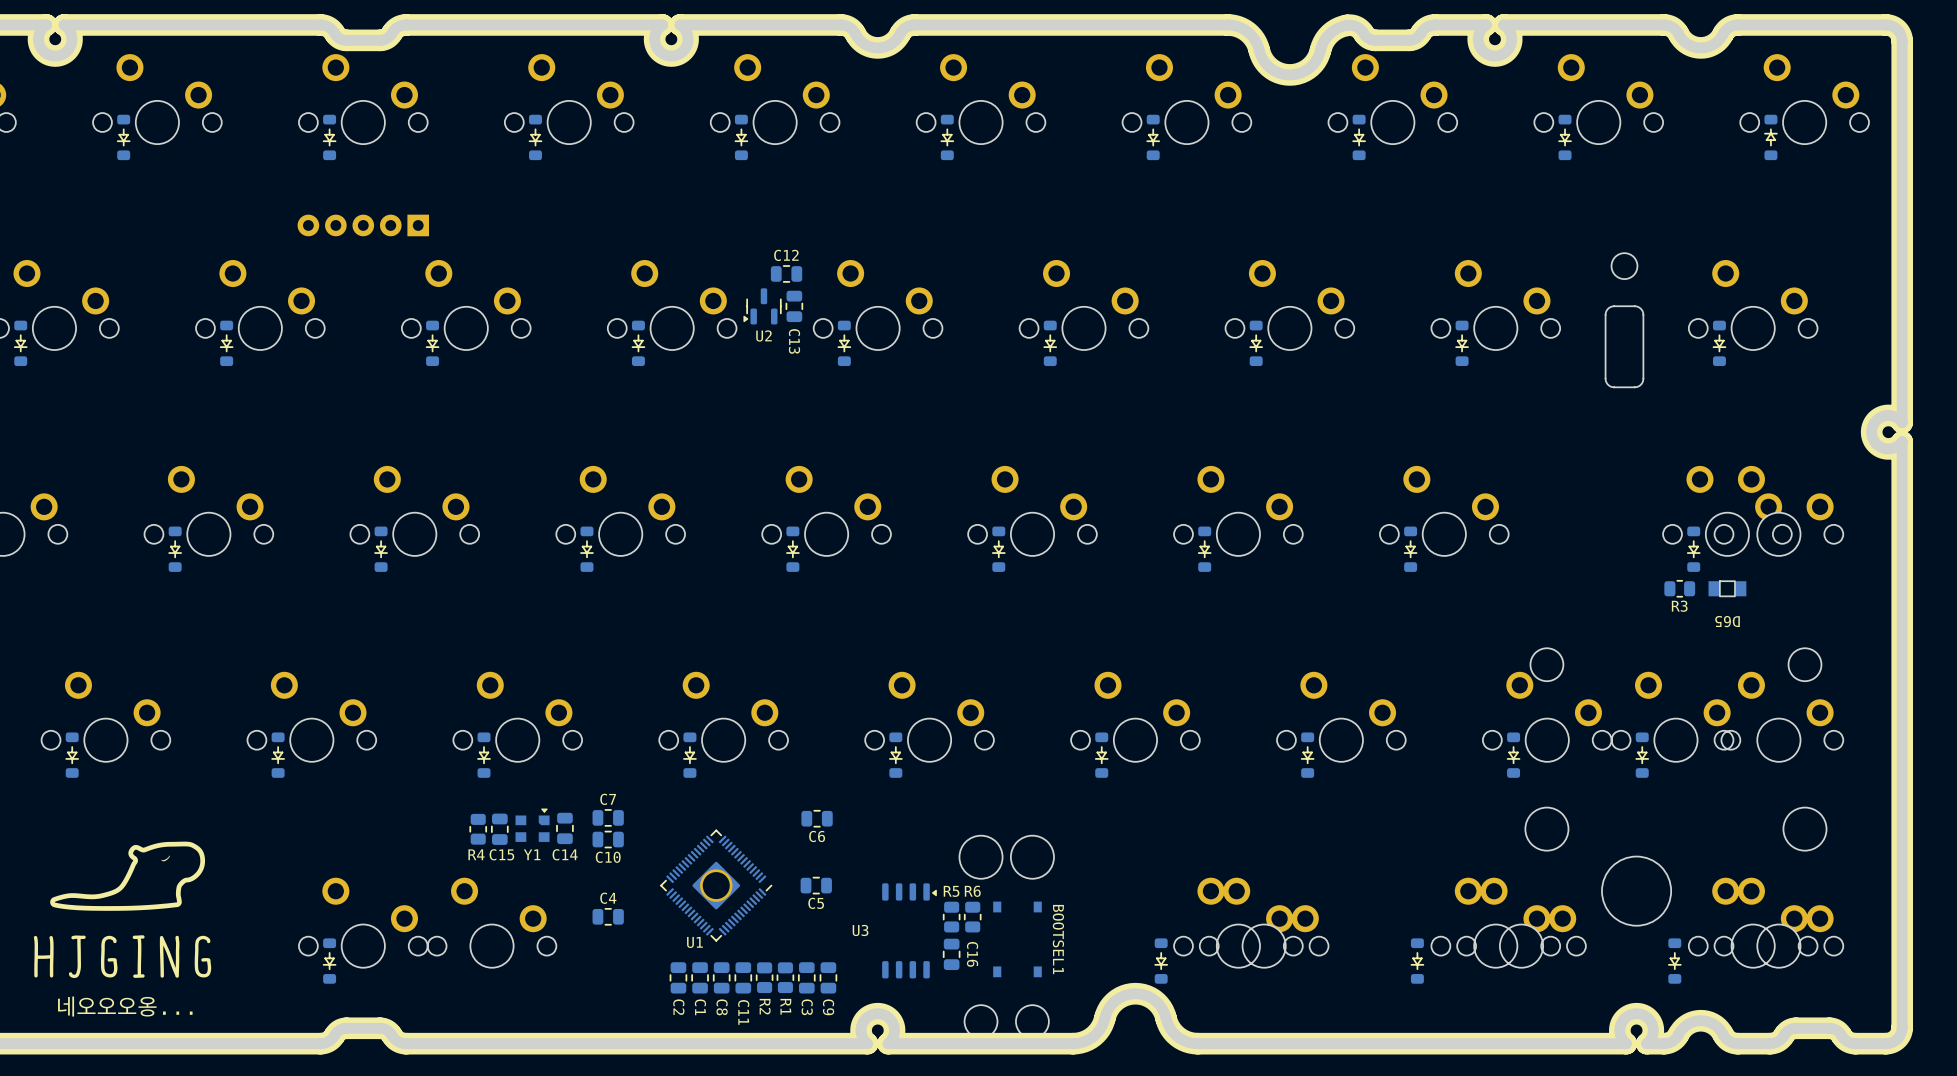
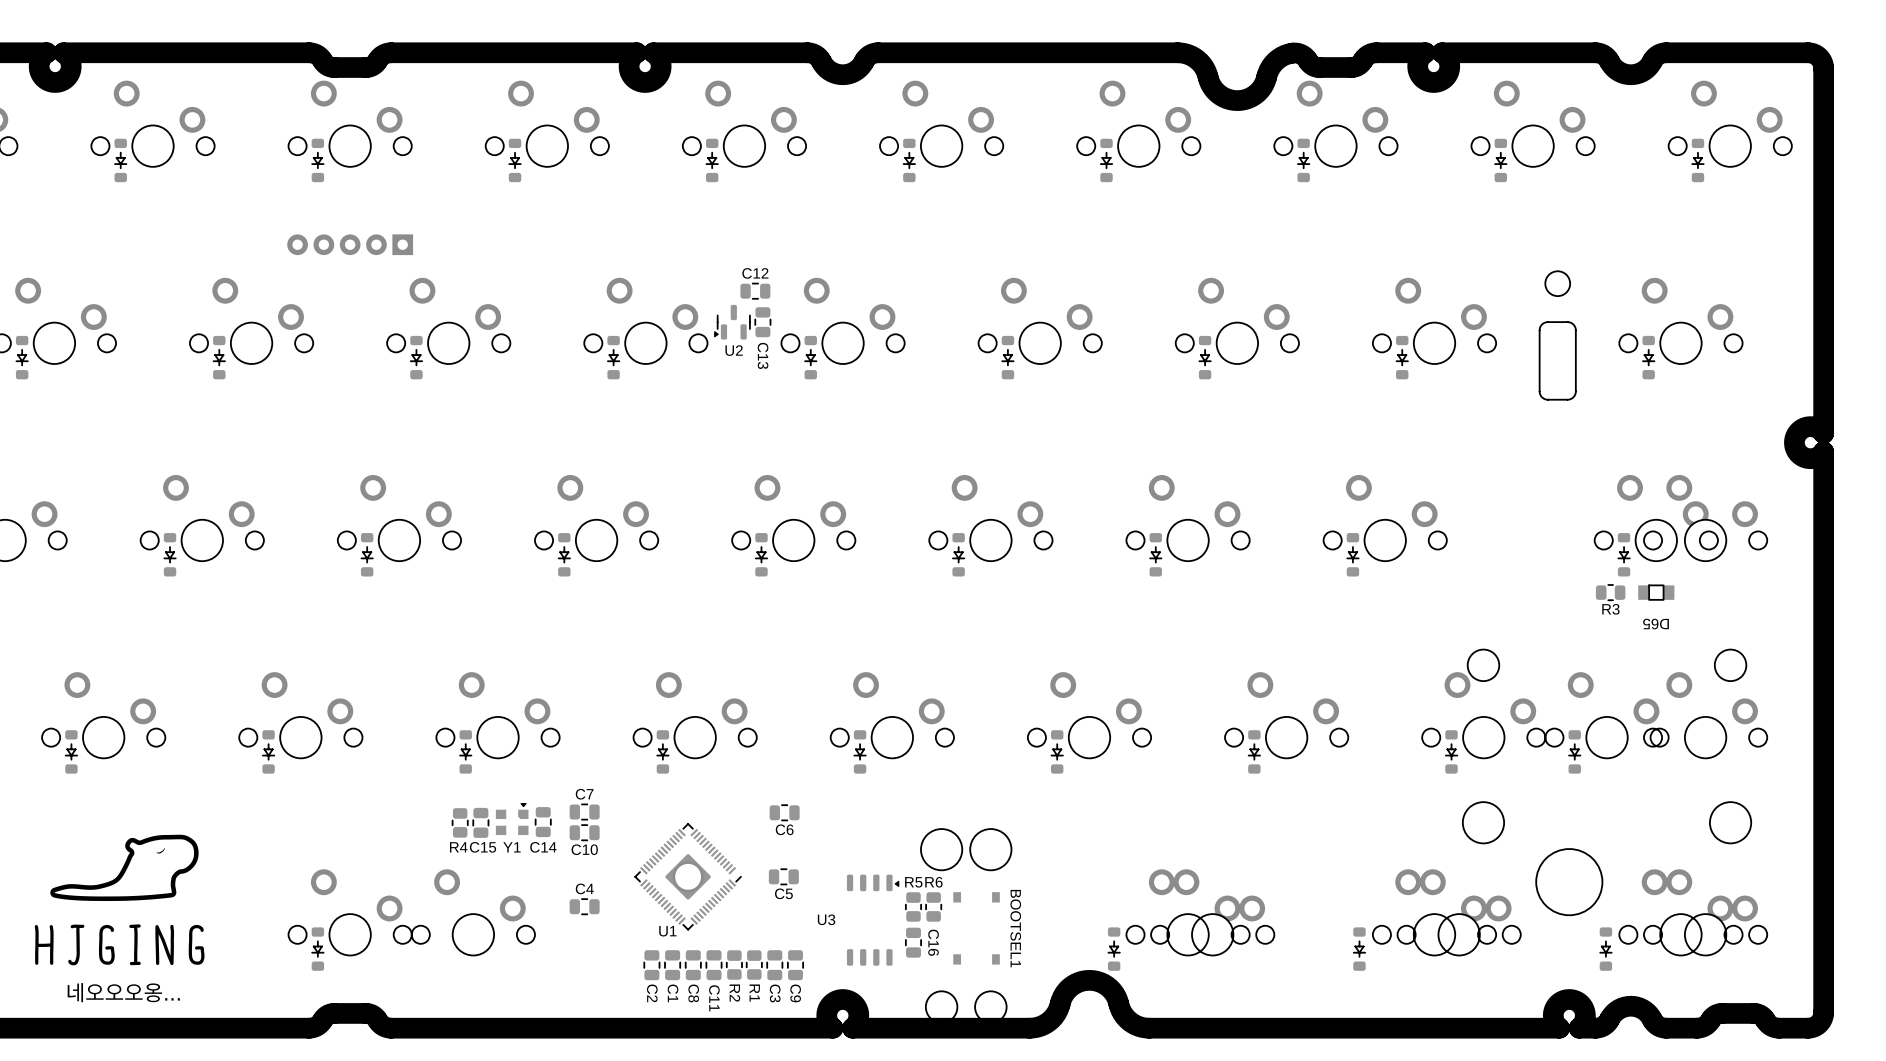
part rotation: 0° (1770, 137) -> 180° (1697, 160)

